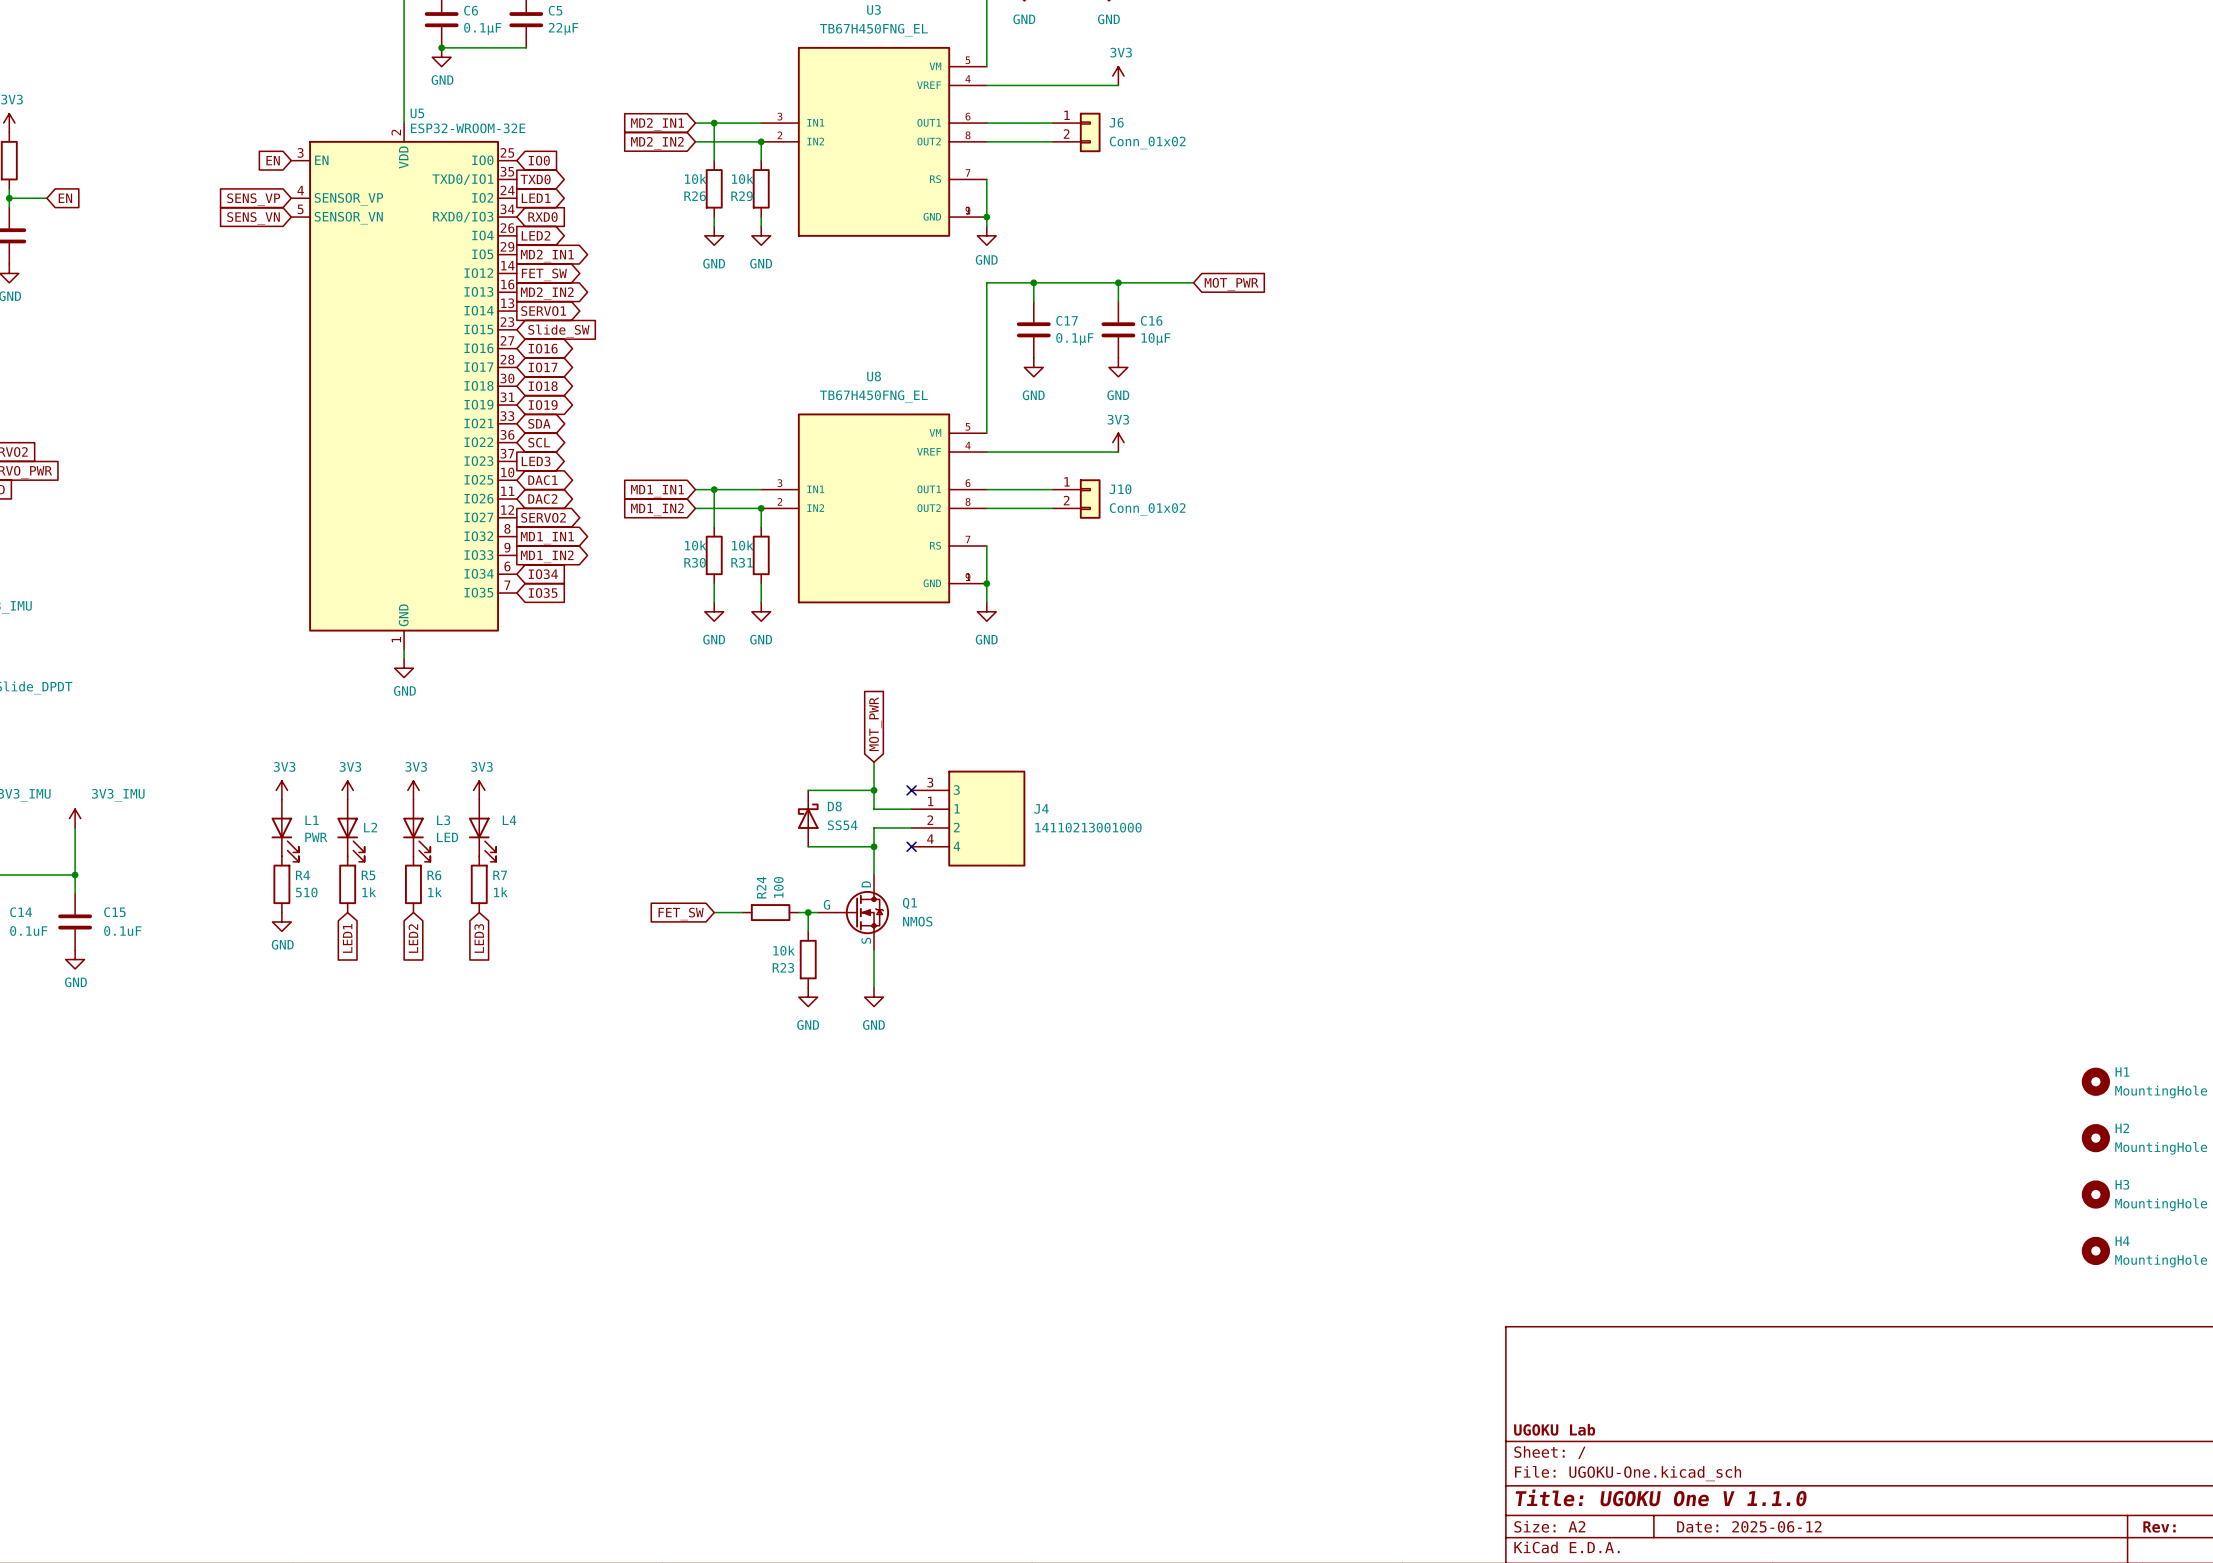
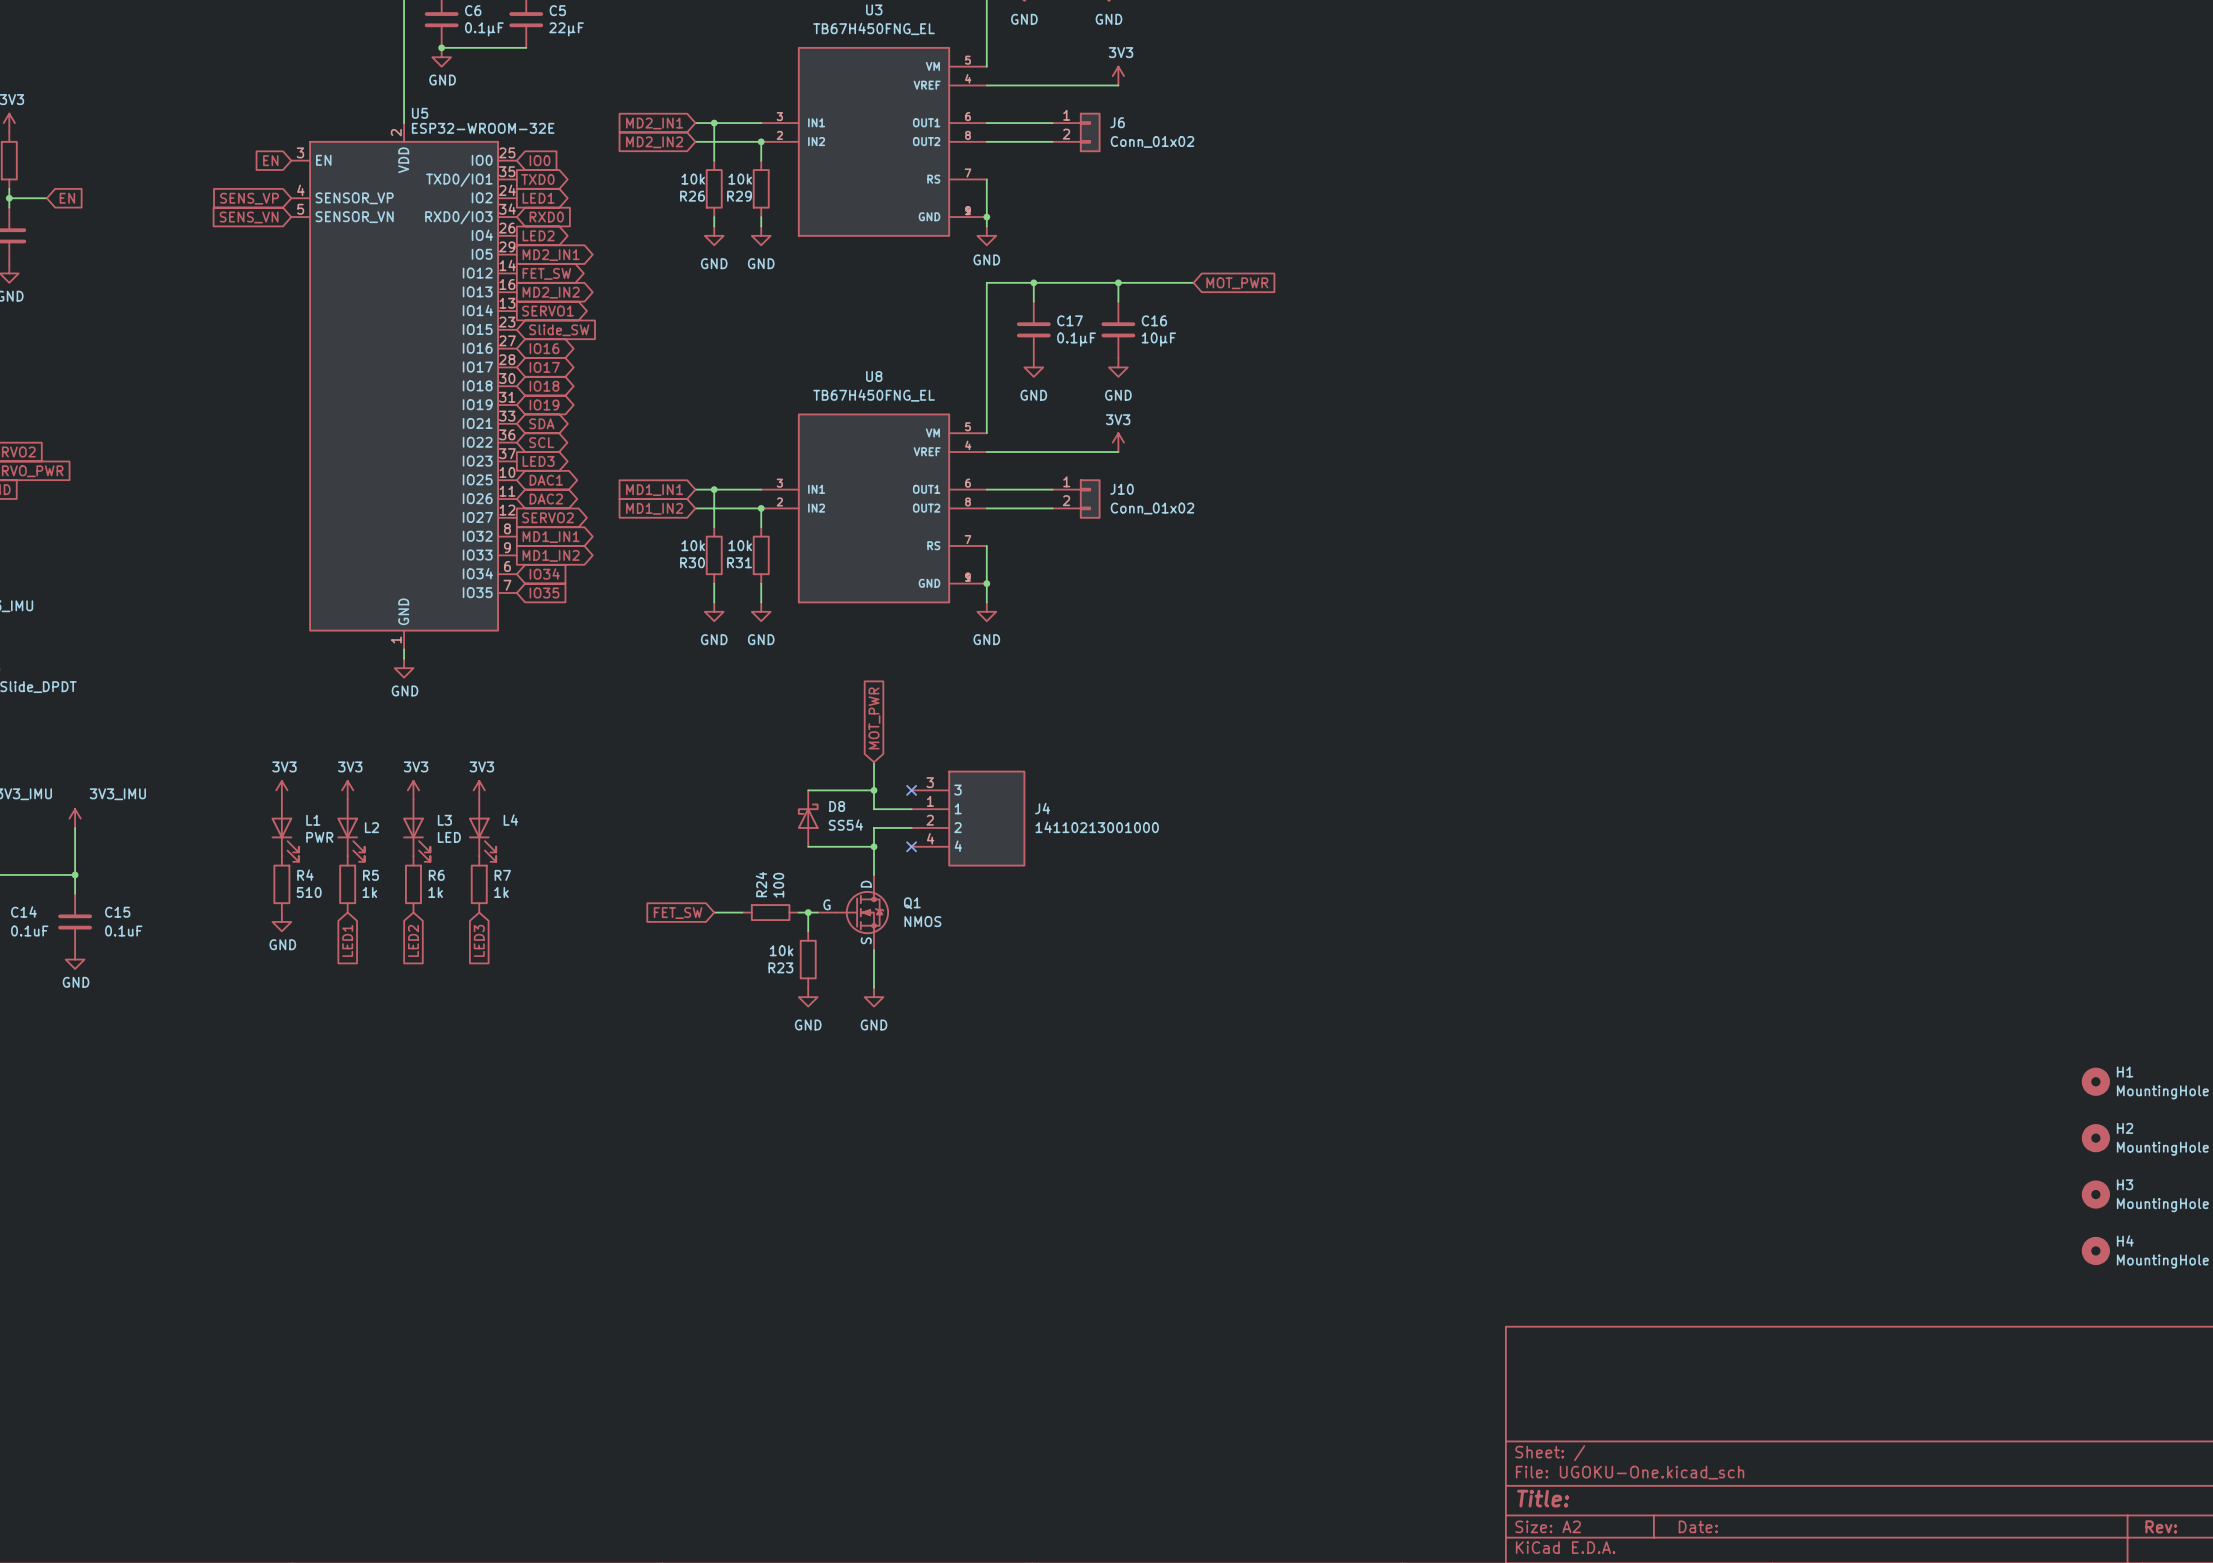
title block: UGOKU Lab (1554, 1429) -> none
title block: Title: UGOKU One V 1.1.0 (1661, 1497) -> Title: (1543, 1498)
title block: Date: 2025-06-12 (1749, 1526) -> Date: (1698, 1526)

